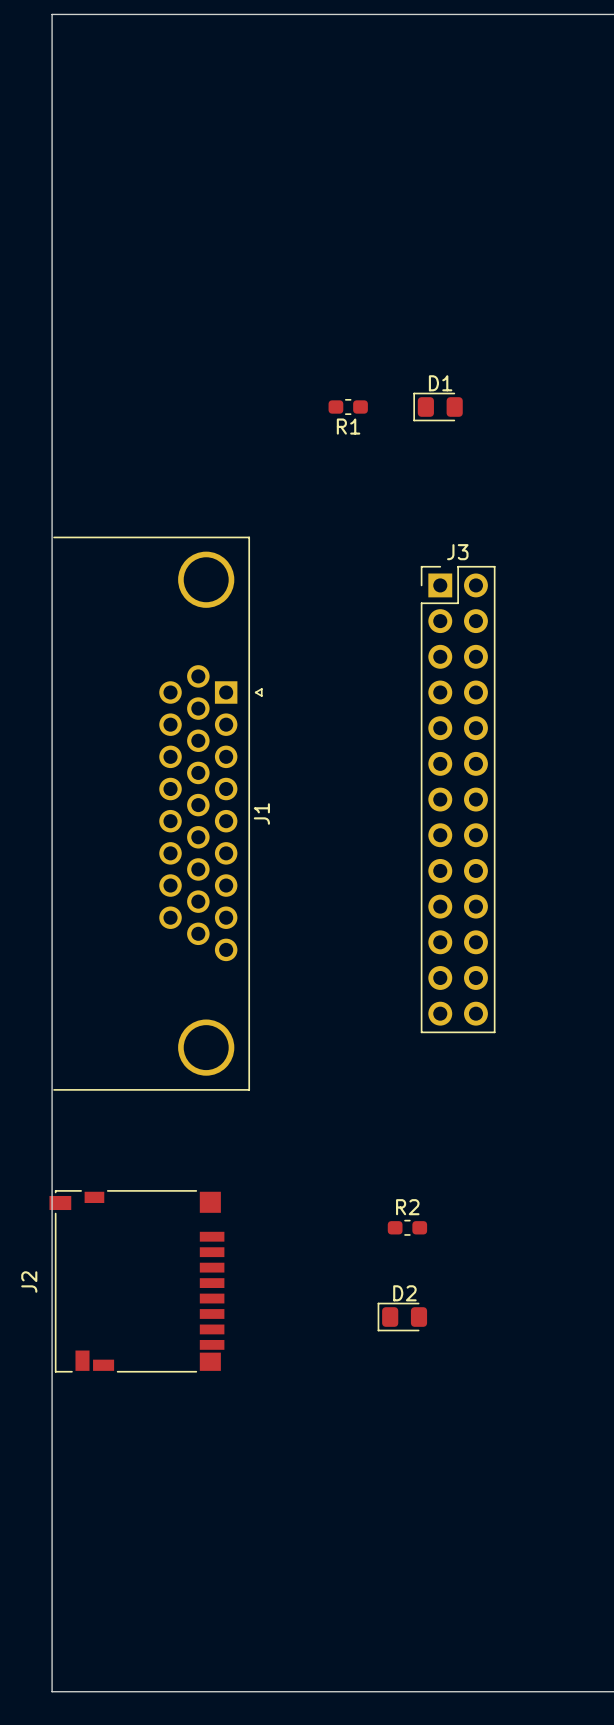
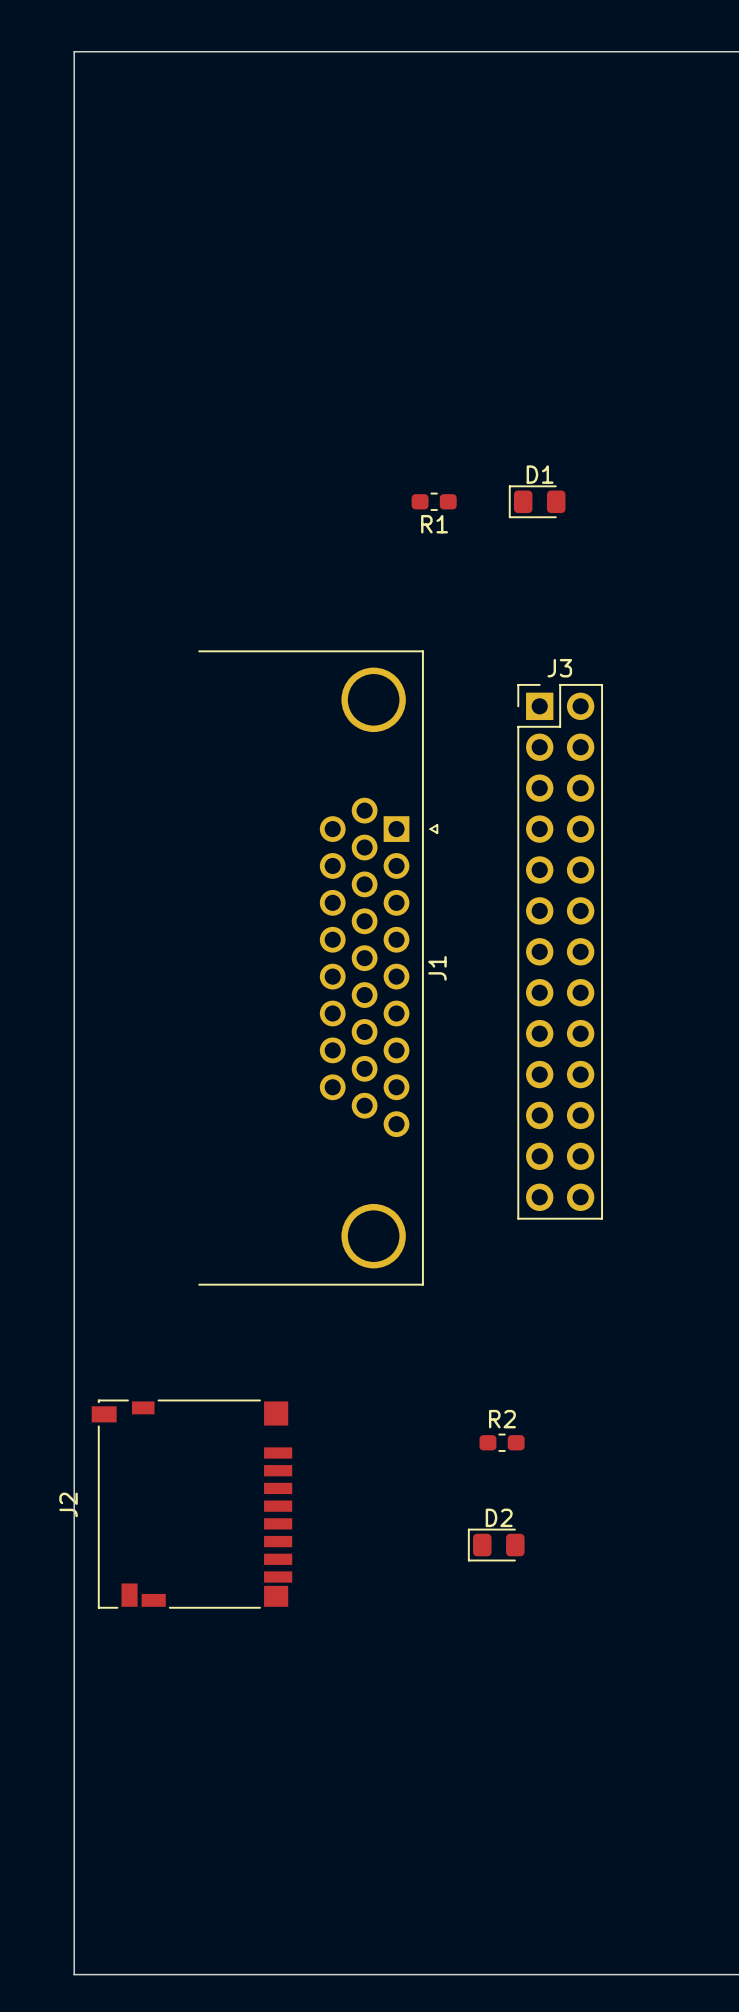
board edge: (52, 14) (52, 1691) -> (94, 51) (74, 51) (74, 1974) (94, 1974)
J1 position: (157, 813) -> (318, 968)

